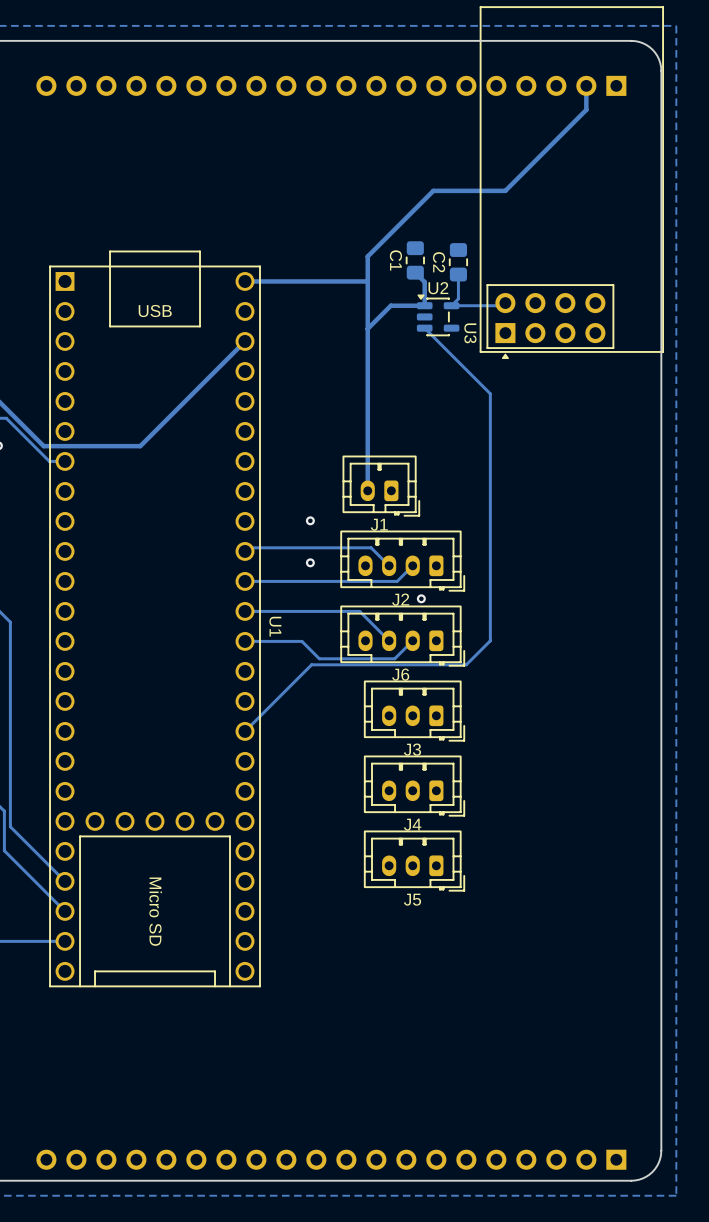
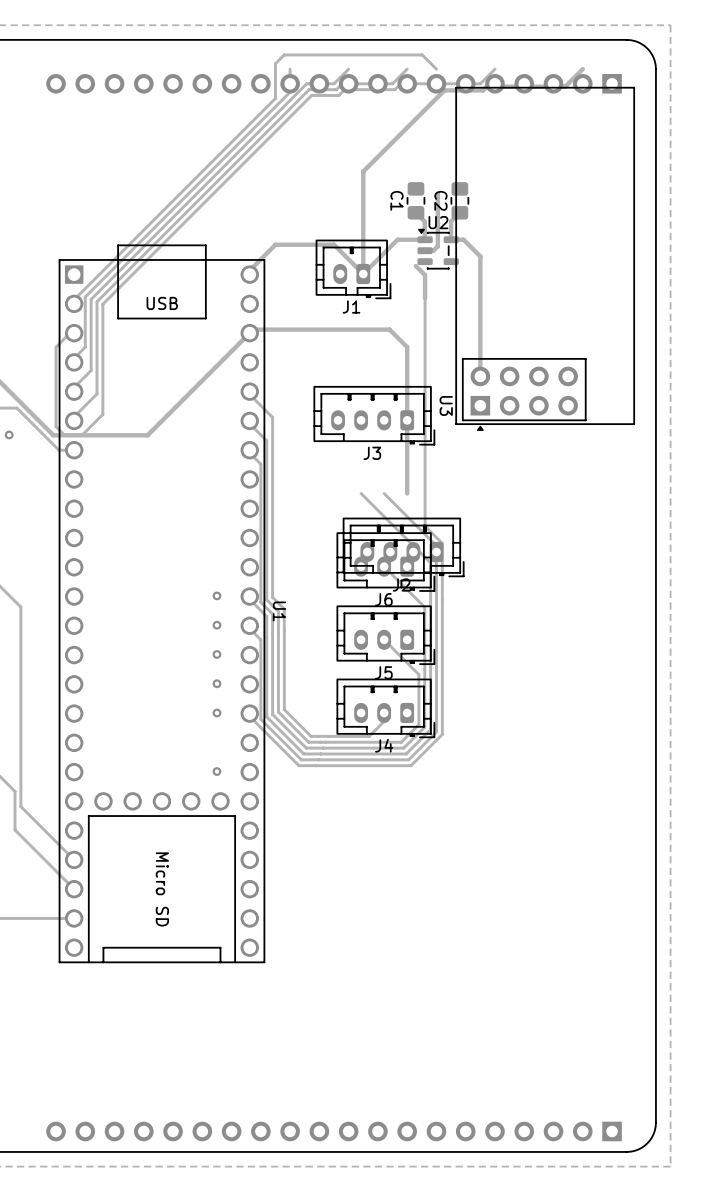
track: none -> (290, 69) (290, 92) (85, 296) (85, 347) (70, 361)
track: none -> (348, 69) (334, 83) (306, 83) (91, 299) (91, 370) (70, 391)
track: none -> (407, 69) (392, 83) (342, 83) (336, 89) (309, 89) (97, 301) (97, 393) (70, 420)
track: none -> (436, 69) (422, 54) (284, 54) (275, 63) (275, 98) (70, 303)
track: none -> (494, 69) (480, 83) (400, 83) (394, 89) (344, 89) (338, 95) (311, 95) (102, 304) (102, 414) (82, 434) (64, 434) (56, 426) (56, 347) (70, 332)
track: none -> (582, 69) (565, 86) (486, 86) (483, 90) (444, 90) (363, 171) (363, 274)
track: (586, 85) (586, 109) (505, 190) (433, 190) (367, 256) (367, 490) -> none
U3 position: (571, 182) -> (545, 259)
track: none -> (437, 193) (437, 246) (433, 250) (425, 250)
track: none -> (415, 212) (424, 221) (425, 239) (397, 239) (363, 274)
track: none -> (459, 212) (451, 221) (451, 239) (463, 239) (480, 256) (480, 376)
C1 position: (415, 260) -> (415, 200)
C2 position: (458, 262) -> (459, 200)
track: (458, 274) (458, 298) (451, 305) (502, 305) (505, 303) -> none
track: none -> (363, 274) (334, 244) (275, 244) (246, 274)
track: (367, 280) (245, 281) -> none
track: (424, 305) (390, 305) (367, 328) -> (425, 298) (425, 526) (442, 543) (442, 734) (411, 765) (316, 765)
U2 position: (438, 315) -> (438, 249)
track: (424, 328) (490, 393) (490, 640) (466, 664) (311, 664) (245, 731) -> none
track: none -> (246, 332) (249, 329) (389, 329) (407, 347) (407, 493)
track: none -> (246, 391) (272, 417) (272, 597) (284, 609) (284, 709) (311, 736) (369, 736) (384, 721) (384, 712)
track: none -> (246, 420) (266, 440) (266, 599) (278, 611) (278, 712) (308, 742) (401, 742) (418, 724) (418, 674) (384, 639)
track: none -> (246, 449) (260, 464) (260, 602) (272, 613) (272, 714) (306, 748) (403, 748) (424, 727) (424, 607) (384, 566)
J1 position: (381, 486) -> (353, 269)
track: none -> (361, 493) (430, 563) (430, 729) (406, 753) (303, 753) (266, 716) (266, 616) (246, 595)
track: none -> (384, 493) (436, 545) (436, 731) (408, 759) (318, 759)
via: (310, 520) -> none
track: (245, 551) (248, 547) (371, 547) (389, 565) -> none
via: (310, 562) -> none
track: (412, 565) (397, 581) (245, 581) -> none
via: (421, 598) -> none
J6 footprint: [340, 605, 465, 667] -> [336, 532, 436, 592]
via: none -> (216, 595)
track: (245, 611) (359, 611) (389, 640) -> none
via: none -> (216, 625)
track: none -> (246, 625) (260, 639) (260, 719) (301, 759) (318, 759)
track: (412, 640) (394, 658) (319, 658) (302, 641) (245, 641) -> none
via: none -> (216, 654)
J3 footprint: [364, 680, 465, 742] -> [313, 386, 436, 446]
via: none -> (216, 683)
via: none -> (216, 712)
track: none -> (246, 712) (298, 765) (316, 765)
J4 position: (414, 786) -> (385, 708)
via: none -> (216, 771)
J5 position: (414, 861) -> (385, 635)

